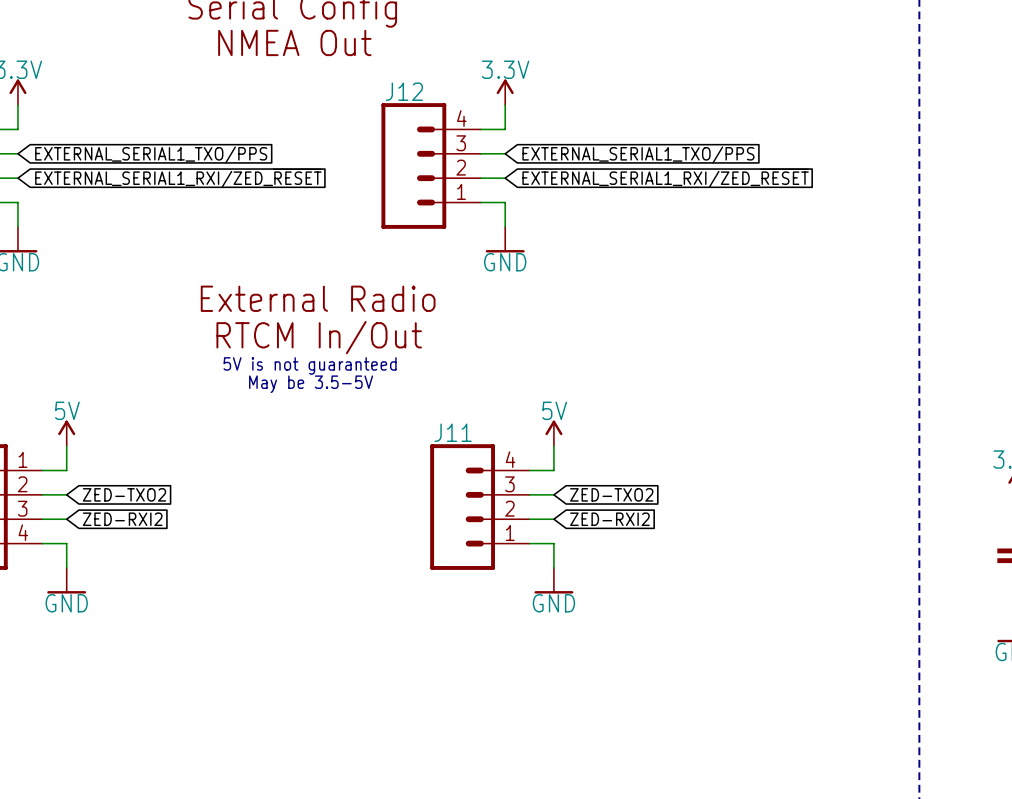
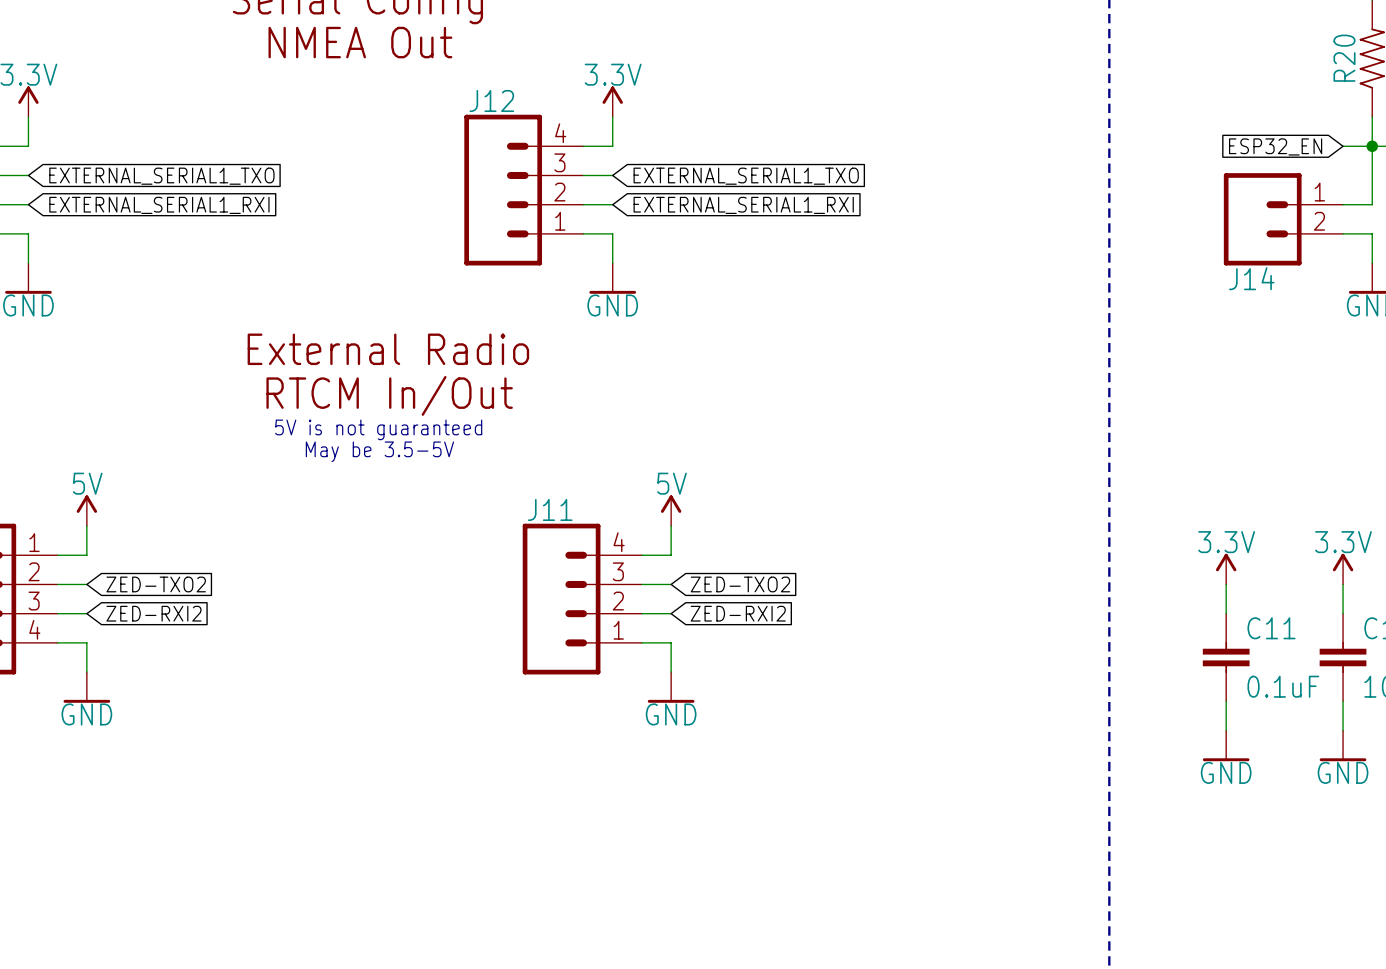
global label: EXTERNAL_SERIAL1_TXO/PPS (151, 154) -> EXTERNAL_SERIAL1_TXO (161, 176)
global label: EXTERNAL_SERIAL1_TXO/PPS (638, 154) -> EXTERNAL_SERIAL1_TXO (746, 176)
global label: EXTERNAL_SERIAL1_RXI/ZED_~{RESET} (178, 178) -> EXTERNAL_SERIAL1_RXI (159, 205)
global label: EXTERNAL_SERIAL1_RXI/ZED_~{RESET} (665, 178) -> EXTERNAL_SERIAL1_RXI (743, 205)

